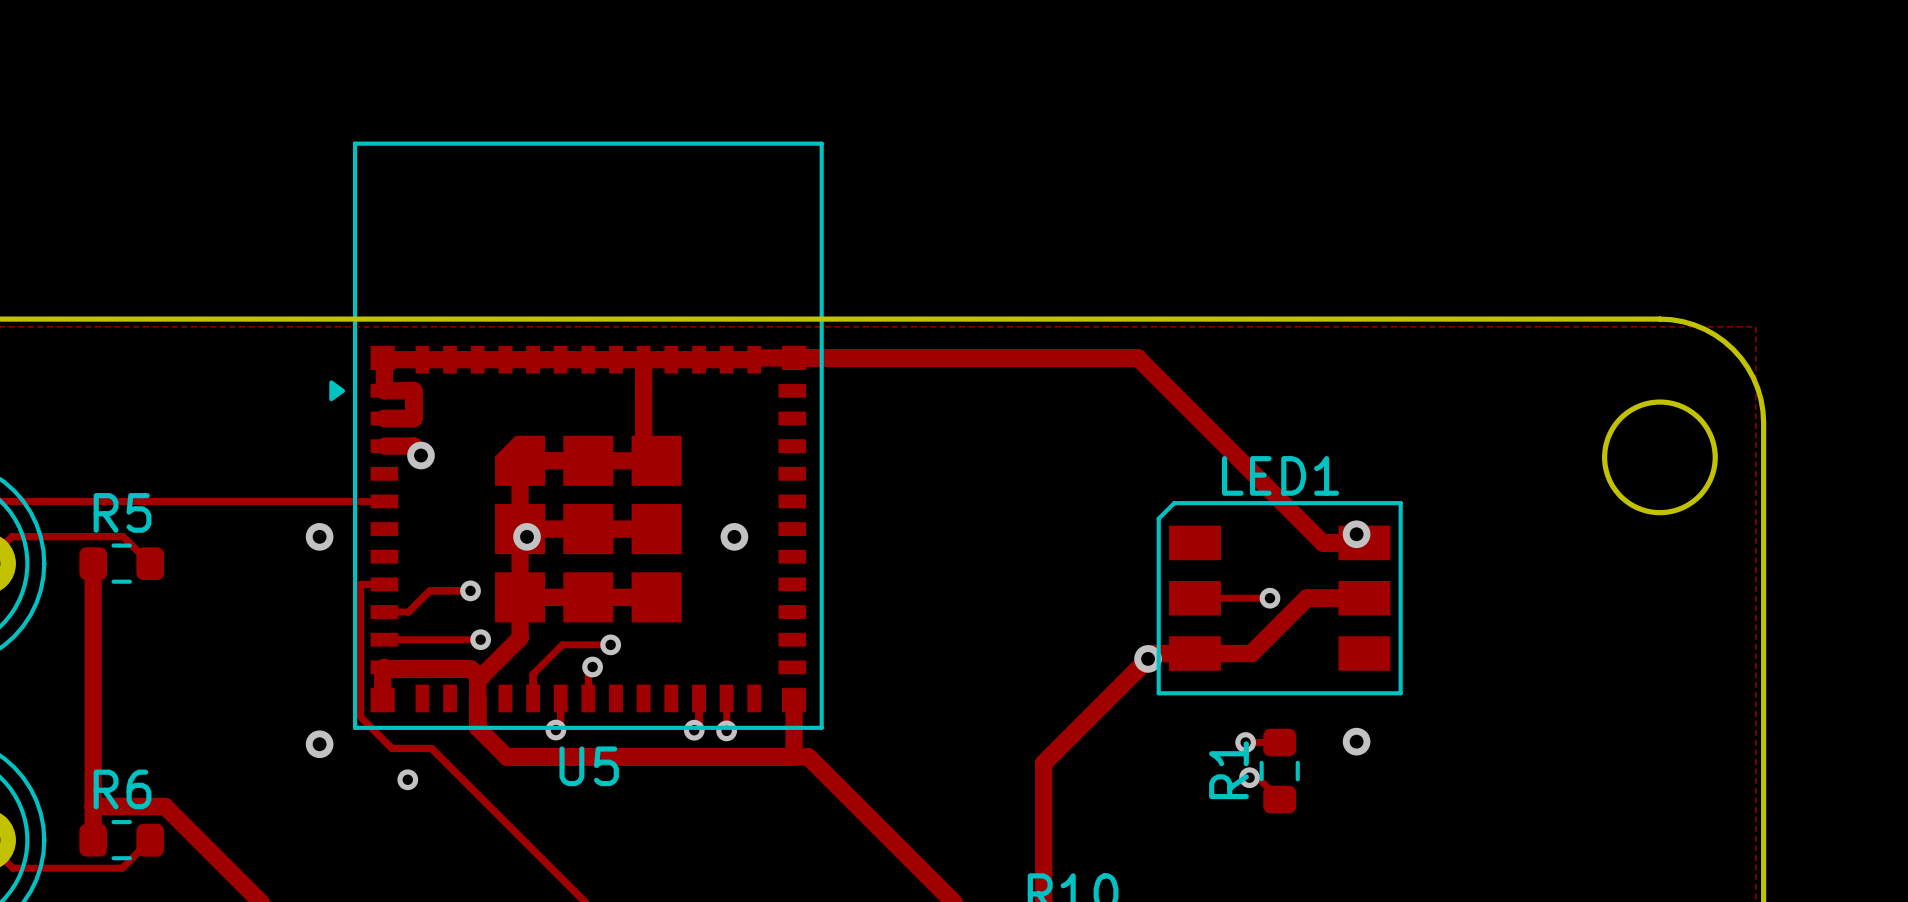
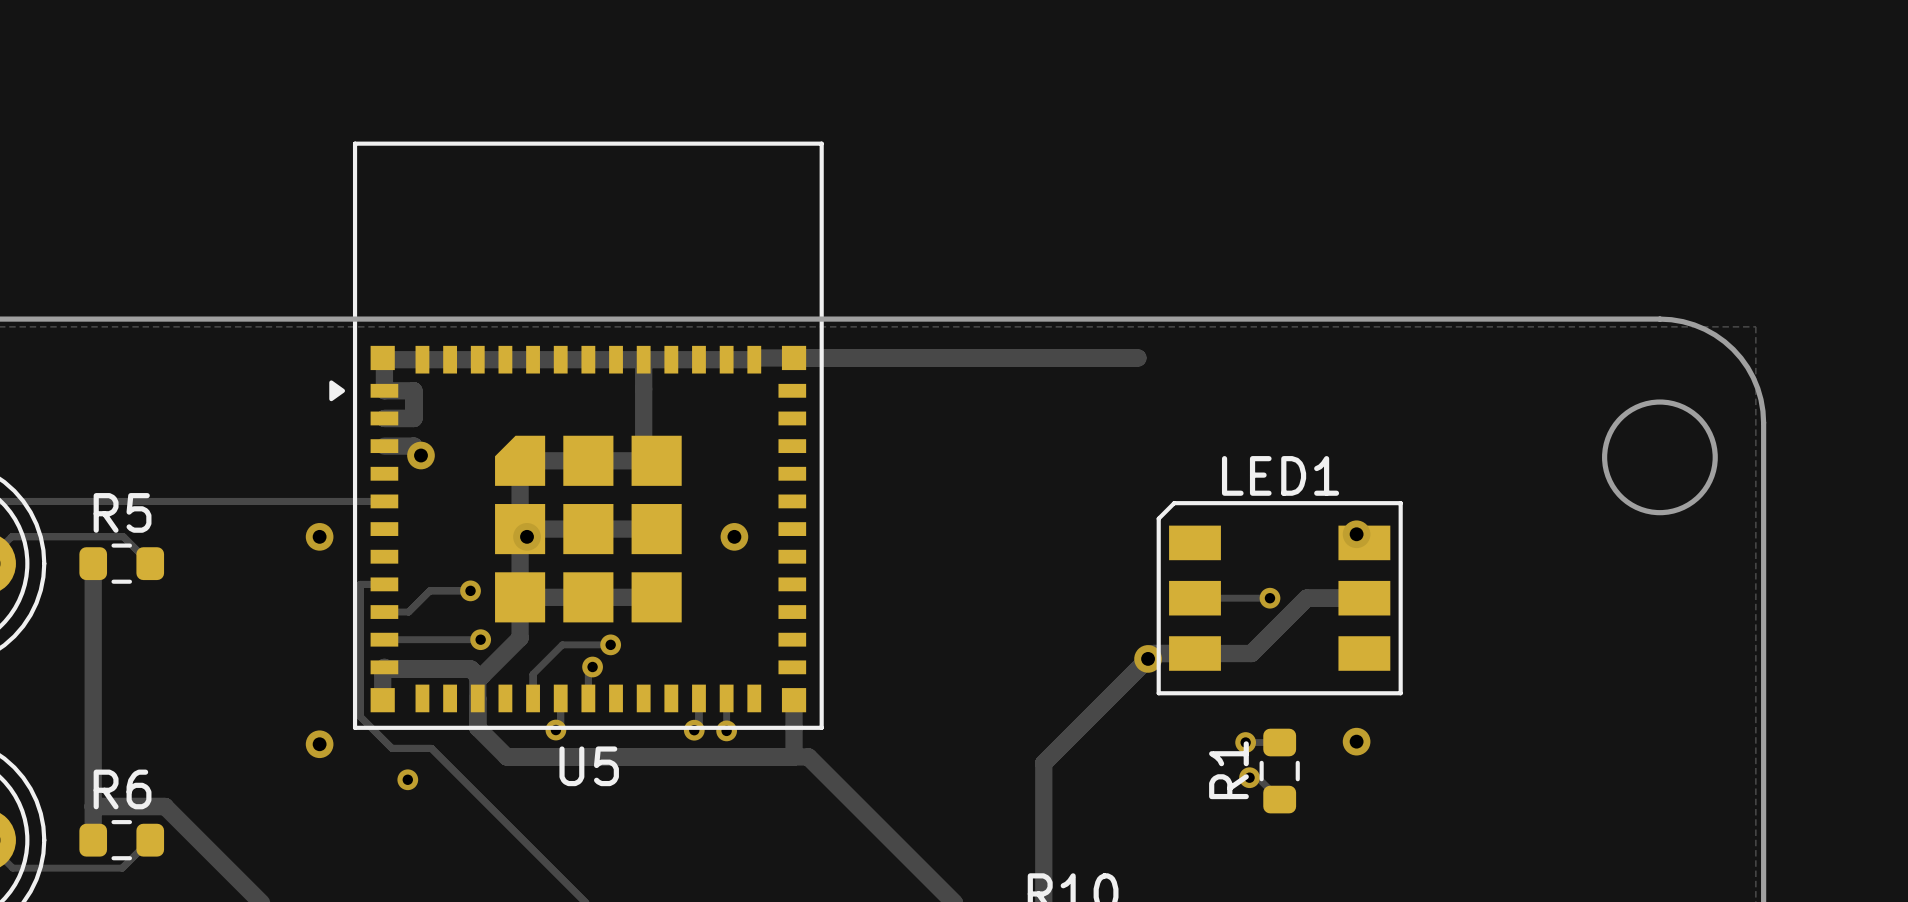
track: (1137, 357) (1322, 542) (1364, 542) -> none

